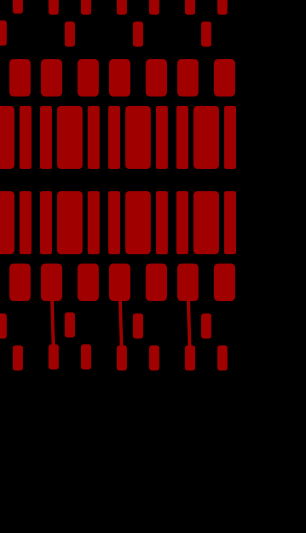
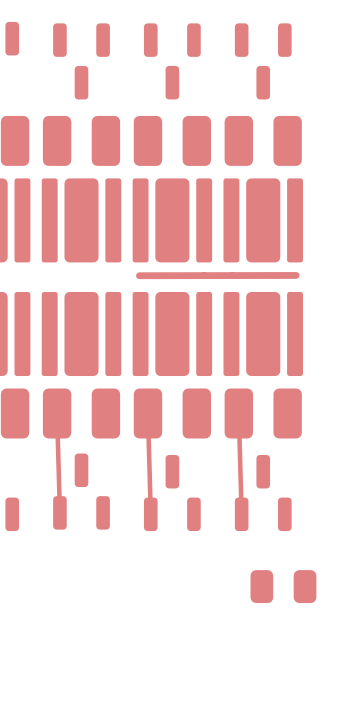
top track: none -> (296, 275) (139, 275)
part: none -> (283, 586)

